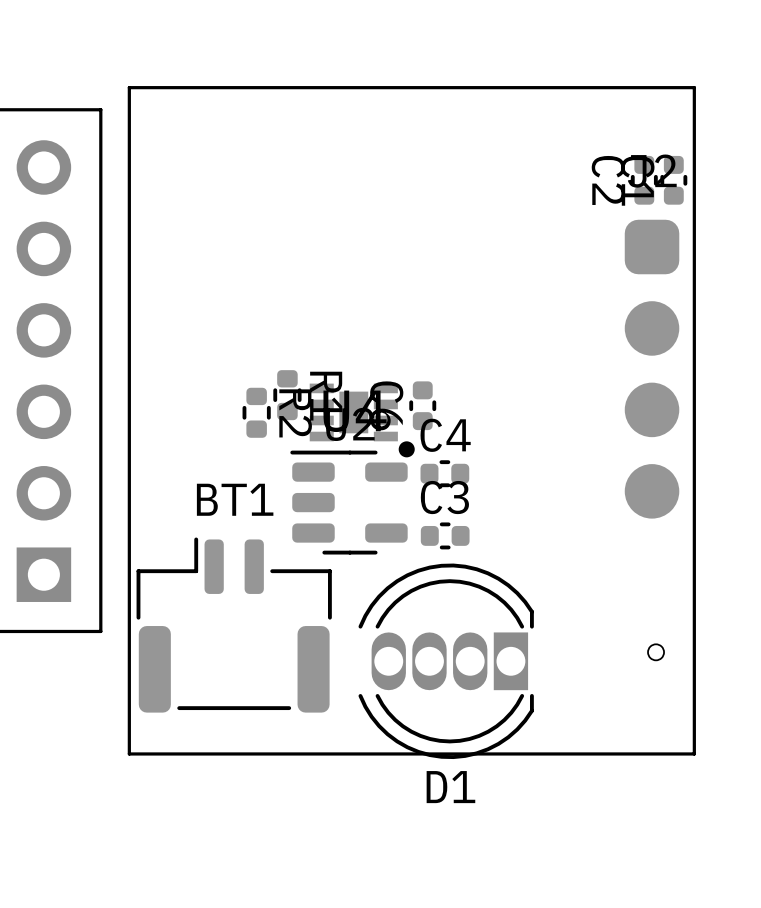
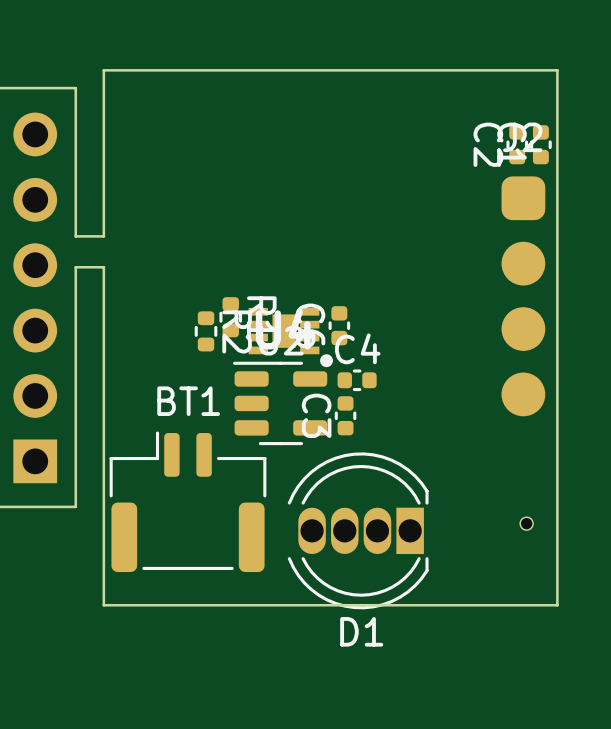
board edge: (94, 109) (100, 109) (100, 631) (94, 631) -> (103, 267) (75, 267) (75, 506)
board edge: (129, 294) (129, 332) -> (103, 236) (75, 236) (75, 88)
C3 rotation: 0° (445, 535) -> 90° clockwise (345, 415)

